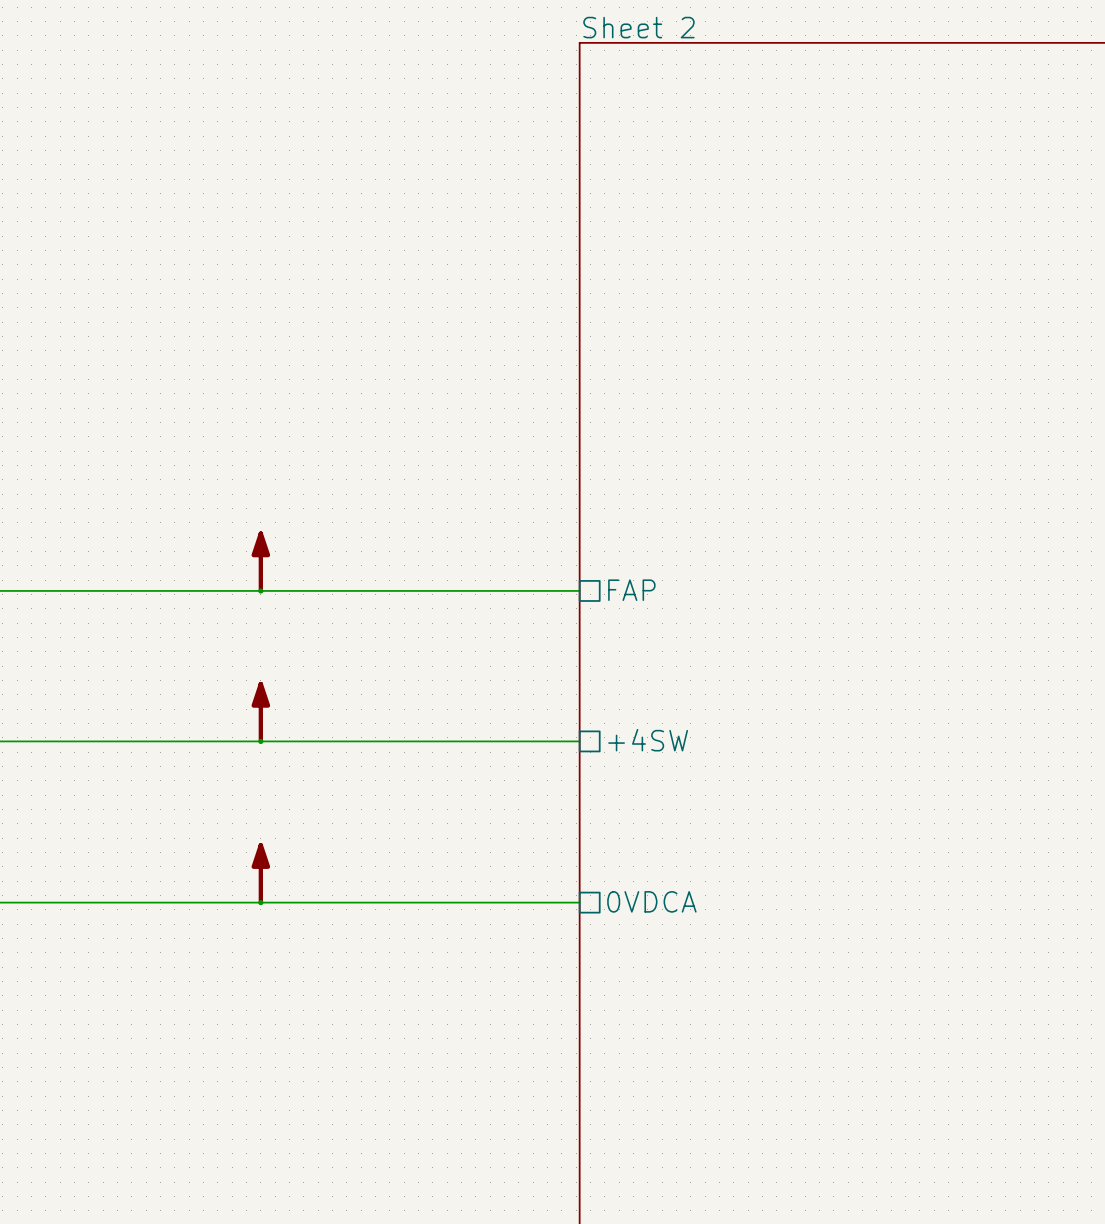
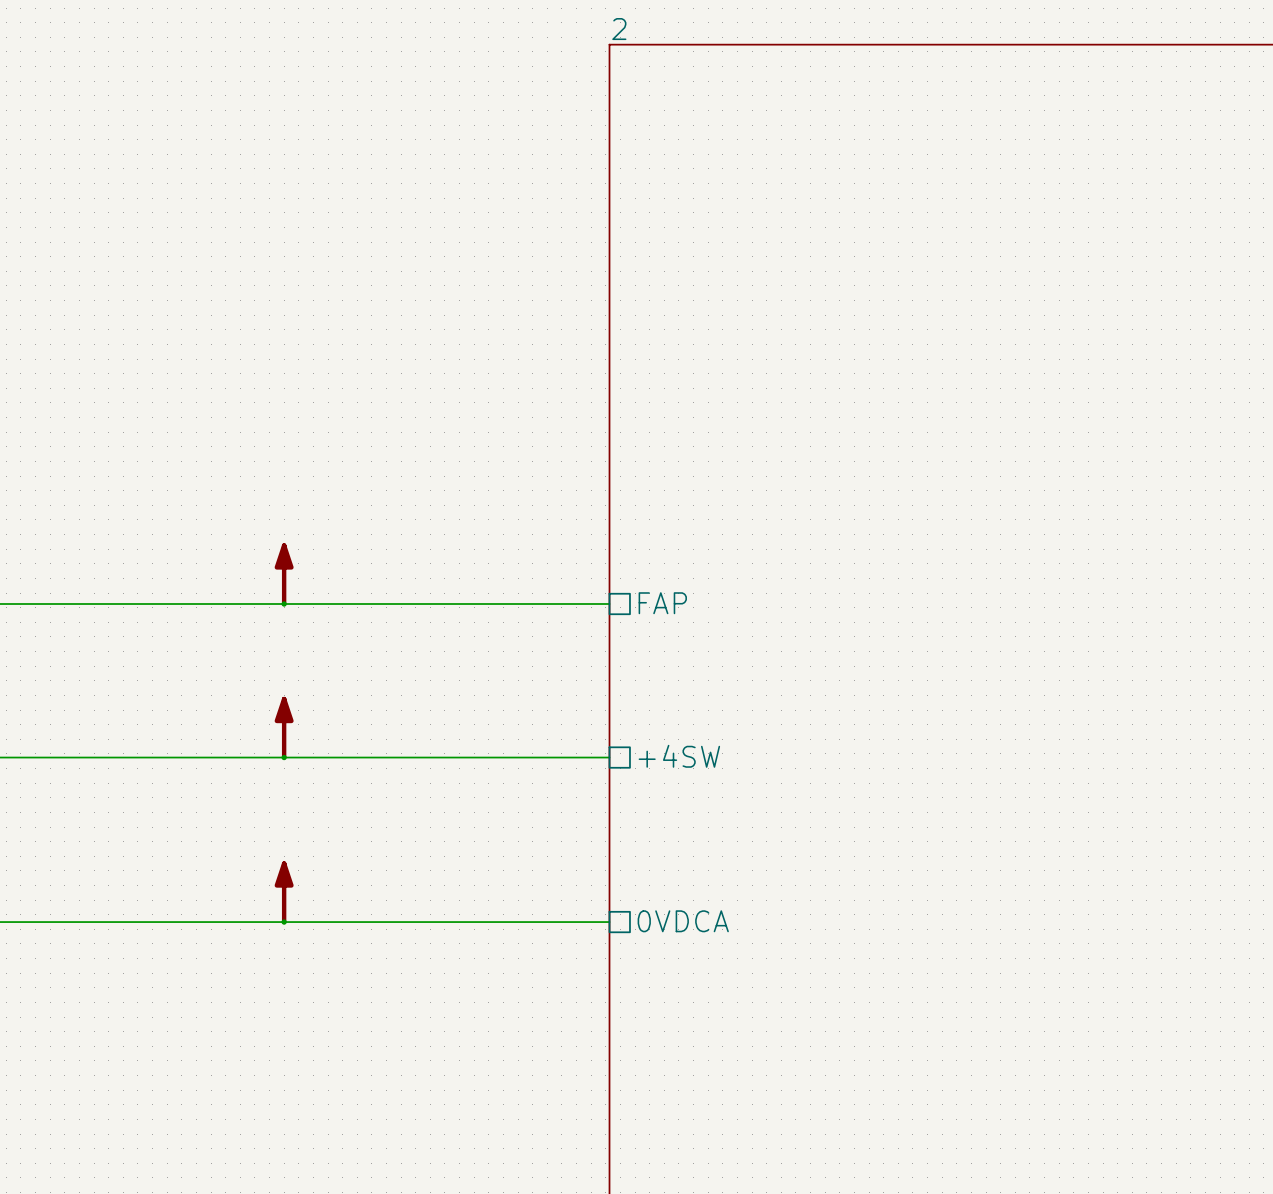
sheet Sheet 2 name: Sheet 2 (638, 27) -> 2 (619, 29)

